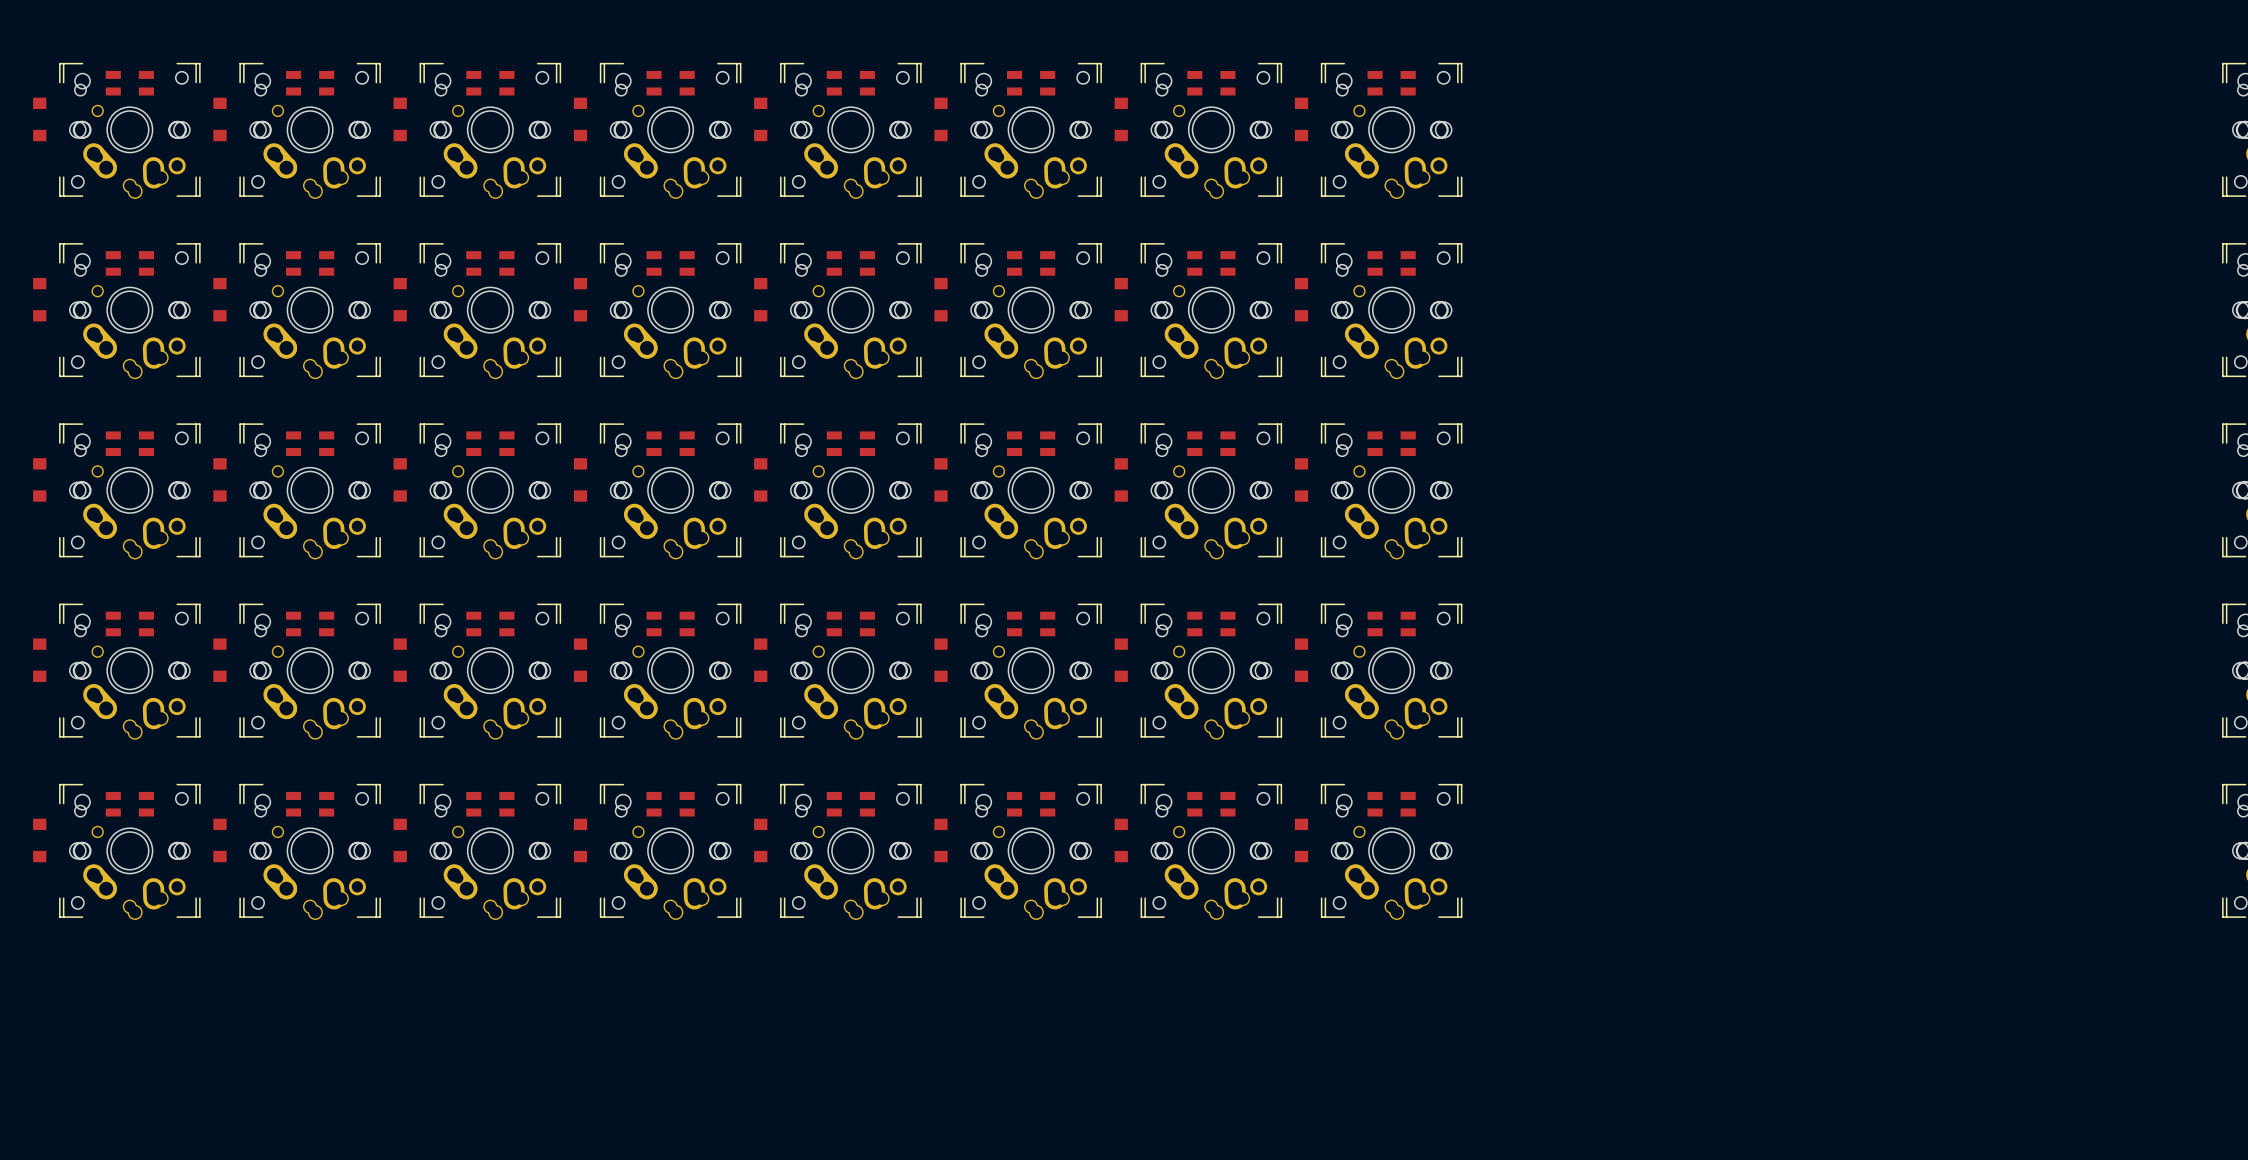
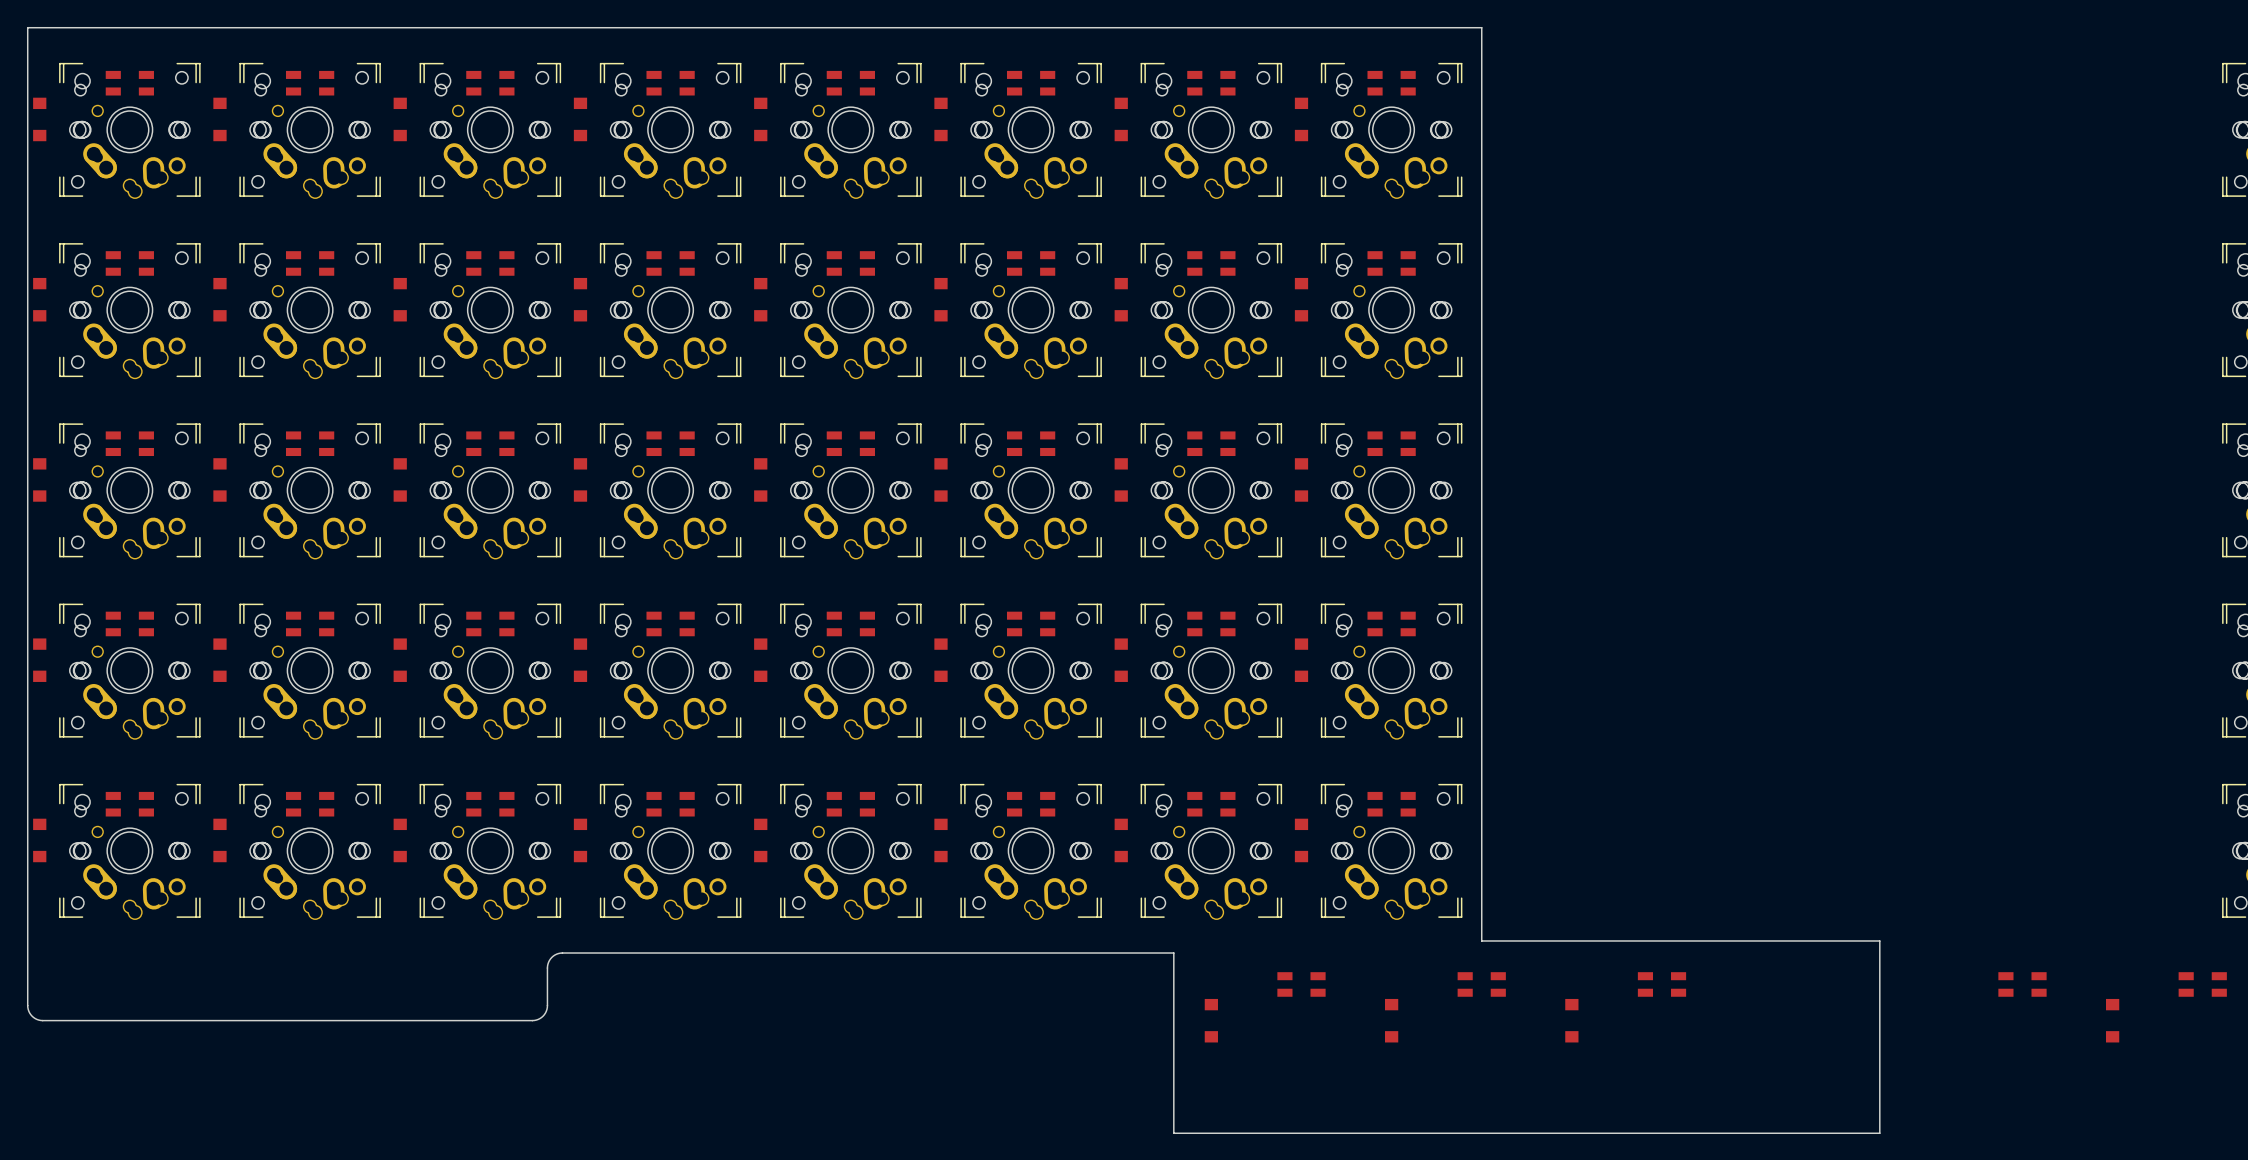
board edge: none -> (562, 953) (1173, 953) (1173, 1133) (1879, 1133) (1879, 940) (1481, 940) (1481, 27) (27, 27) (27, 1005)
board edge: none -> (562, 953) (553, 956) (548, 962) (546, 1009) (541, 1017) (534, 1020) (42, 1020) (32, 1016) (27, 1005)
part: none -> (1301, 984)
part: none -> (1481, 984)
part: none -> (1661, 984)
part: none -> (2022, 984)
part: none -> (2202, 984)
part: none -> (1211, 1020)
part: none -> (1391, 1020)
part: none -> (1571, 1020)
part: none -> (2112, 1020)

